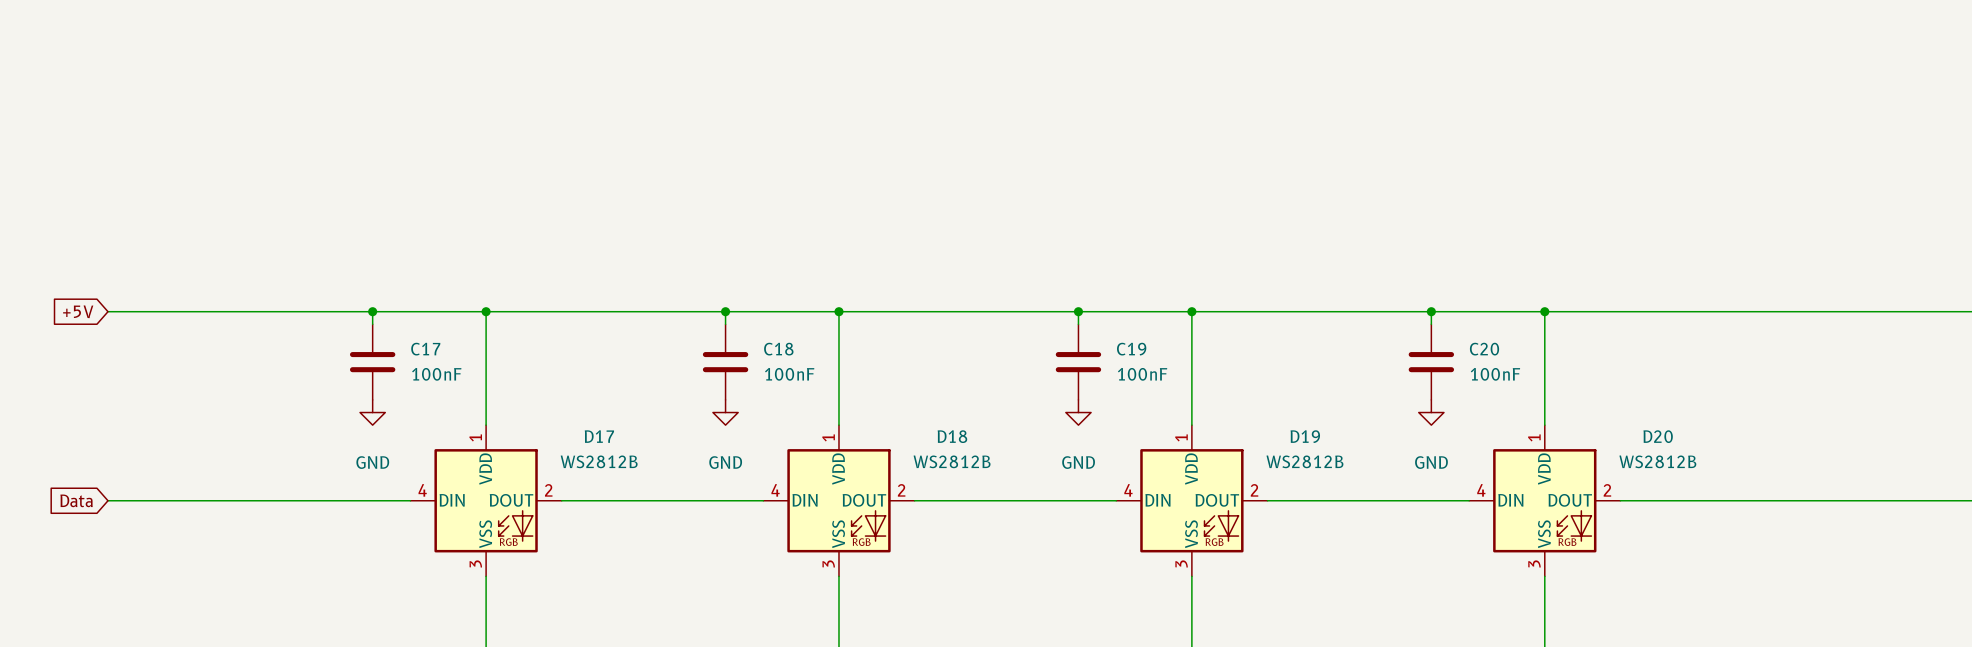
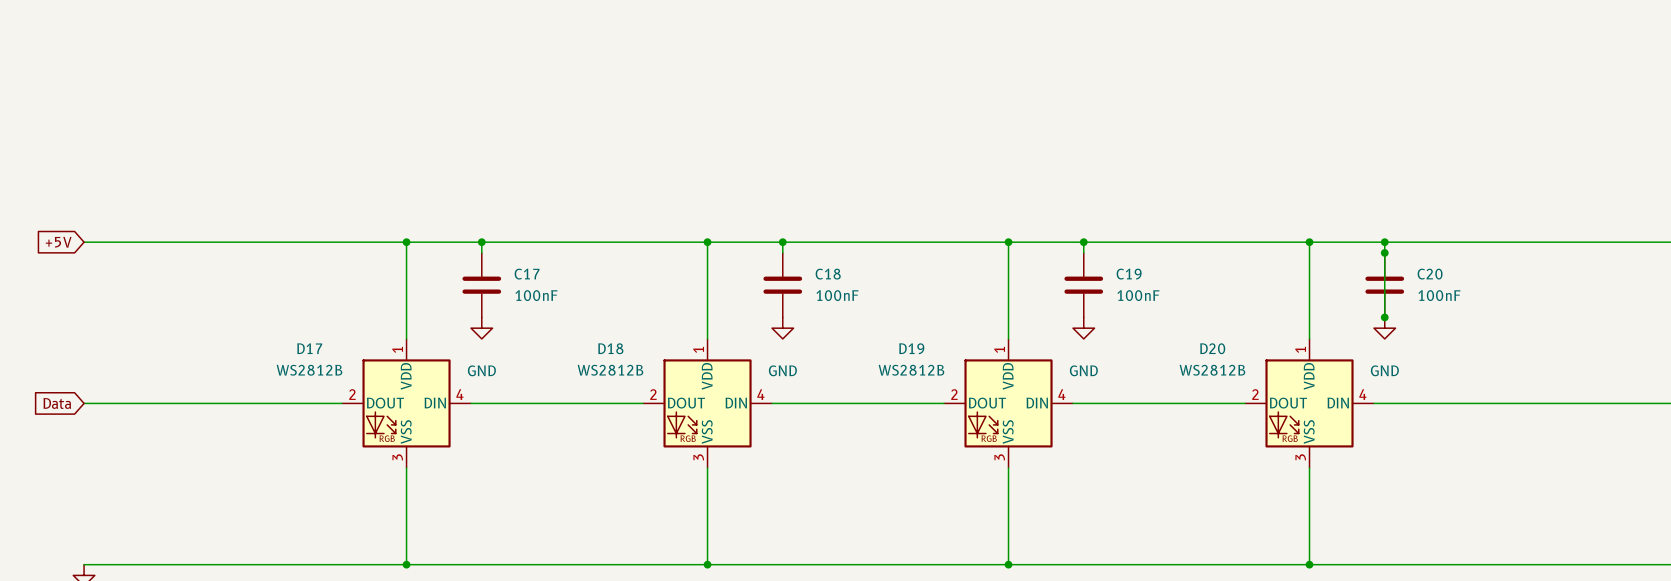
wire: (372, 311) (372, 324) -> none
junction: (372, 311) -> none
junction: none -> (481, 242)
wire: (725, 311) (725, 324) -> (481, 242) (481, 252)
junction: (725, 311) -> none
junction: none -> (782, 242)
wire: (1078, 311) (1078, 324) -> (782, 242) (782, 252)
junction: (1078, 311) -> none
junction: none -> (1083, 242)
wire: (1431, 311) (1431, 324) -> (1083, 242) (1083, 252)
junction: (1431, 311) -> none
wire: none -> (1384, 242) (1384, 317)
junction: none -> (1384, 242)
junction: none -> (1384, 252)
C17 position: (372, 362) -> (481, 285)
C18 position: (725, 362) -> (782, 285)
C19 position: (1078, 362) -> (1083, 285)
C20 position: (1431, 362) -> (1384, 285)
junction: none -> (1384, 317)
power symbol: GND (372, 412) -> none
power symbol: none -> GND (481, 328)
power symbol: GND (725, 412) -> none
power symbol: none -> GND (782, 328)
power symbol: GND (1078, 412) -> none
power symbol: none -> GND (1083, 328)
power symbol: GND (1431, 412) -> none
power symbol: none -> GND (1384, 328)
D17 flip: as is (486, 500) -> left-right (406, 403)
D18 flip: as is (838, 500) -> left-right (707, 403)
D19 flip: as is (1191, 500) -> left-right (1008, 403)
D20 flip: as is (1544, 500) -> left-right (1309, 403)

